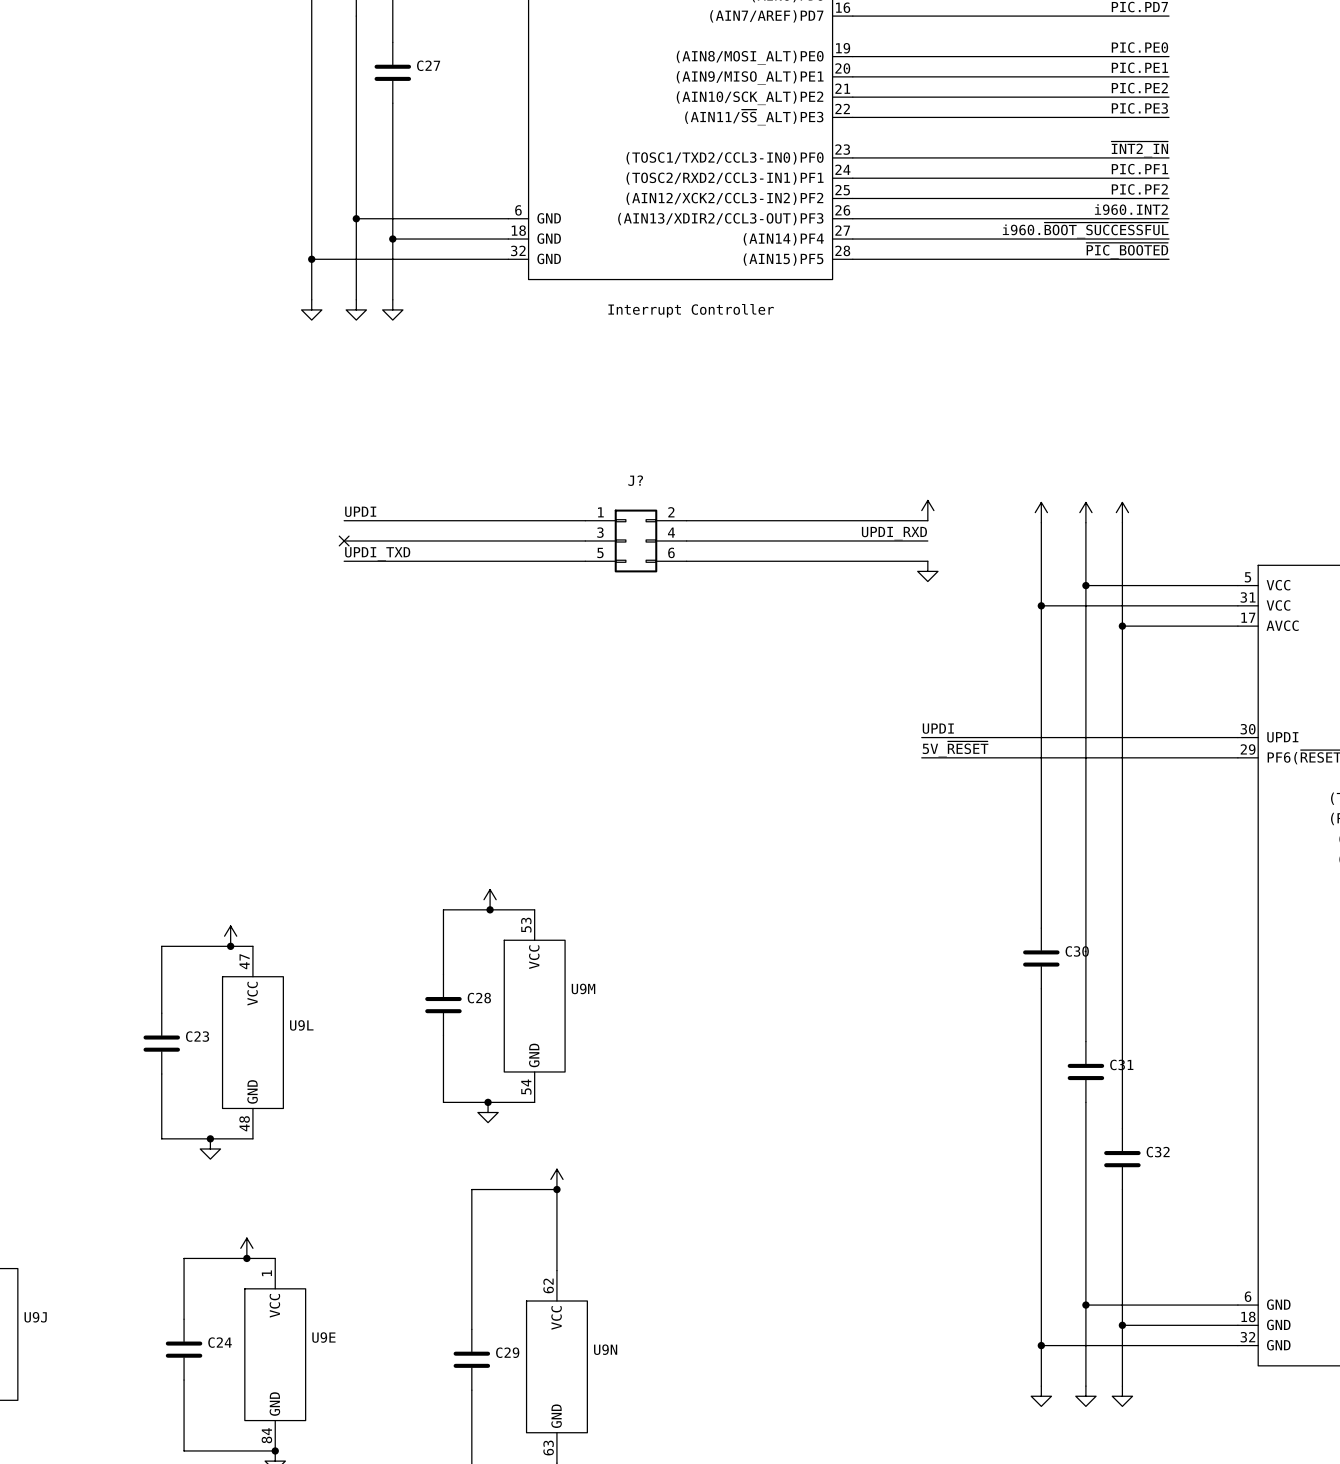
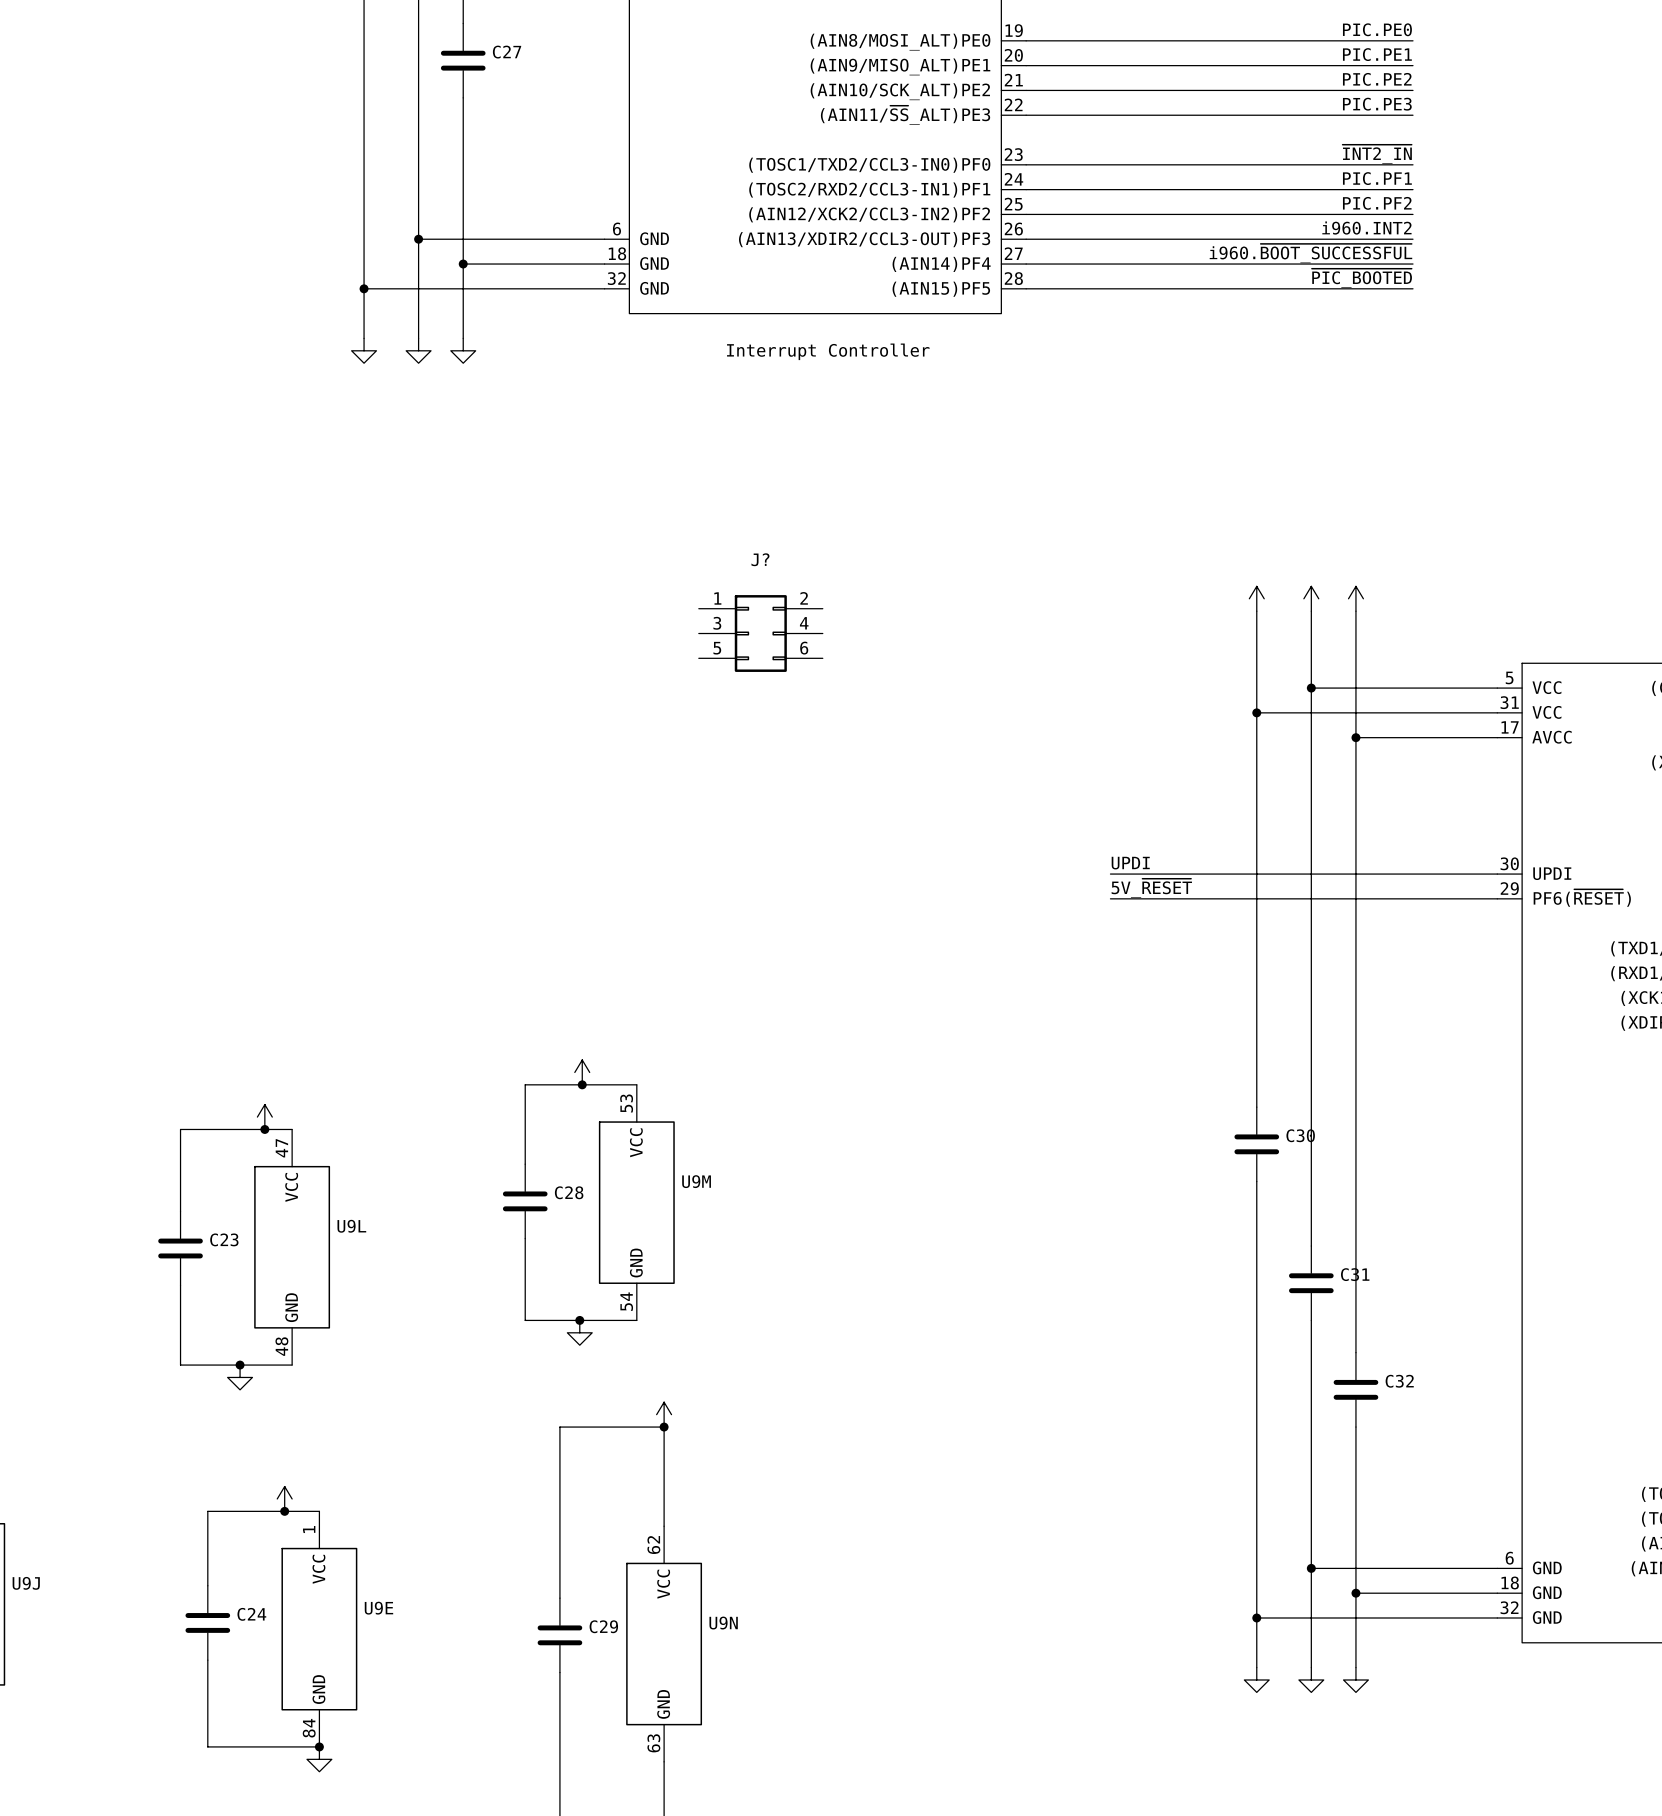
power symbol: (927, 510) -> none
label: UPDI (360, 511) -> none
wire: (344, 520) (585, 520) -> none
wire: (686, 520) (927, 520) -> none
label: UPDI_RXD (894, 533) -> none
wire: (344, 540) (585, 540) -> none
no-connect mark: (344, 540) -> none
wire: (686, 540) (927, 540) -> none
label: UPDI_TXD (377, 553) -> none
wire: (344, 561) (585, 561) -> none
wire: (686, 561) (927, 561) -> none
power symbol: (927, 571) -> none

